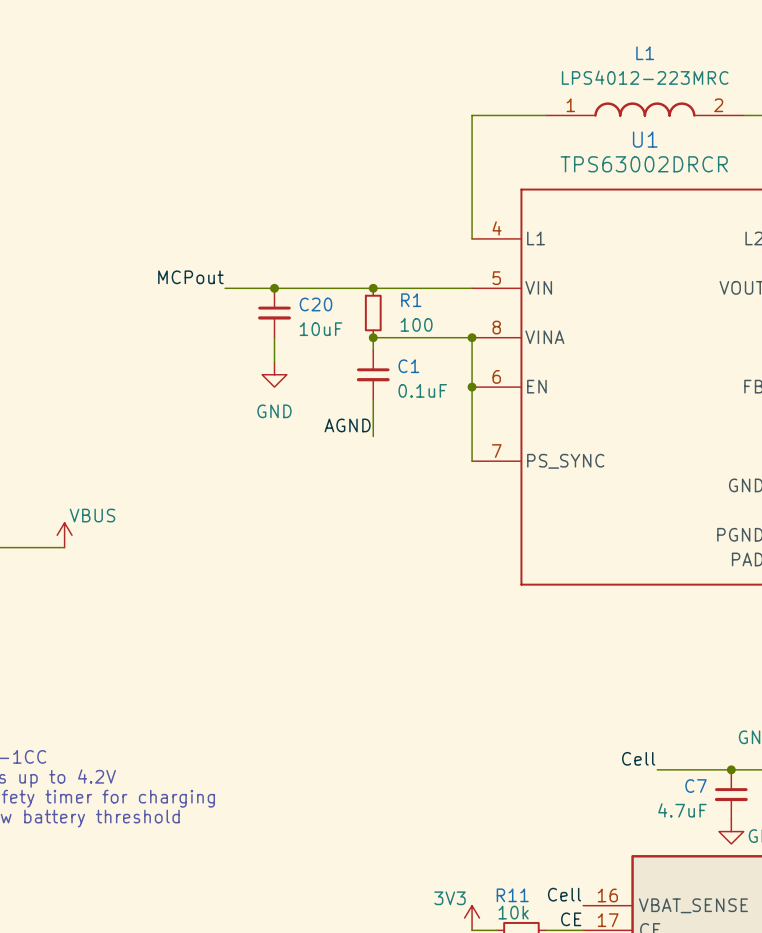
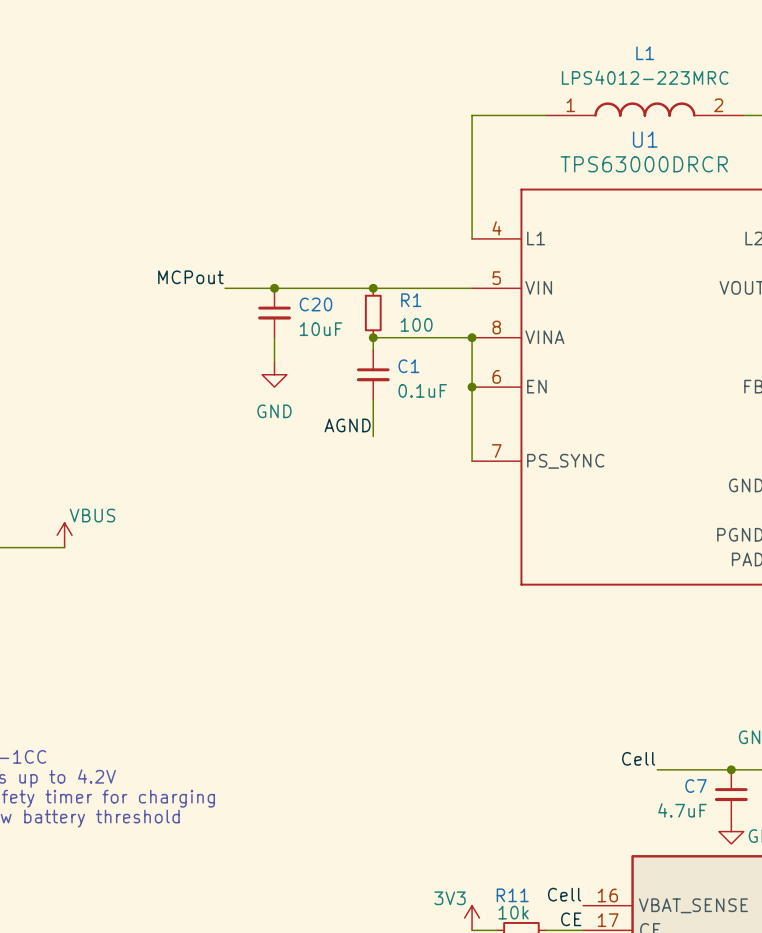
U1 value: TPS63002DRCR (644, 164) -> TPS63000DRCR (644, 164)

